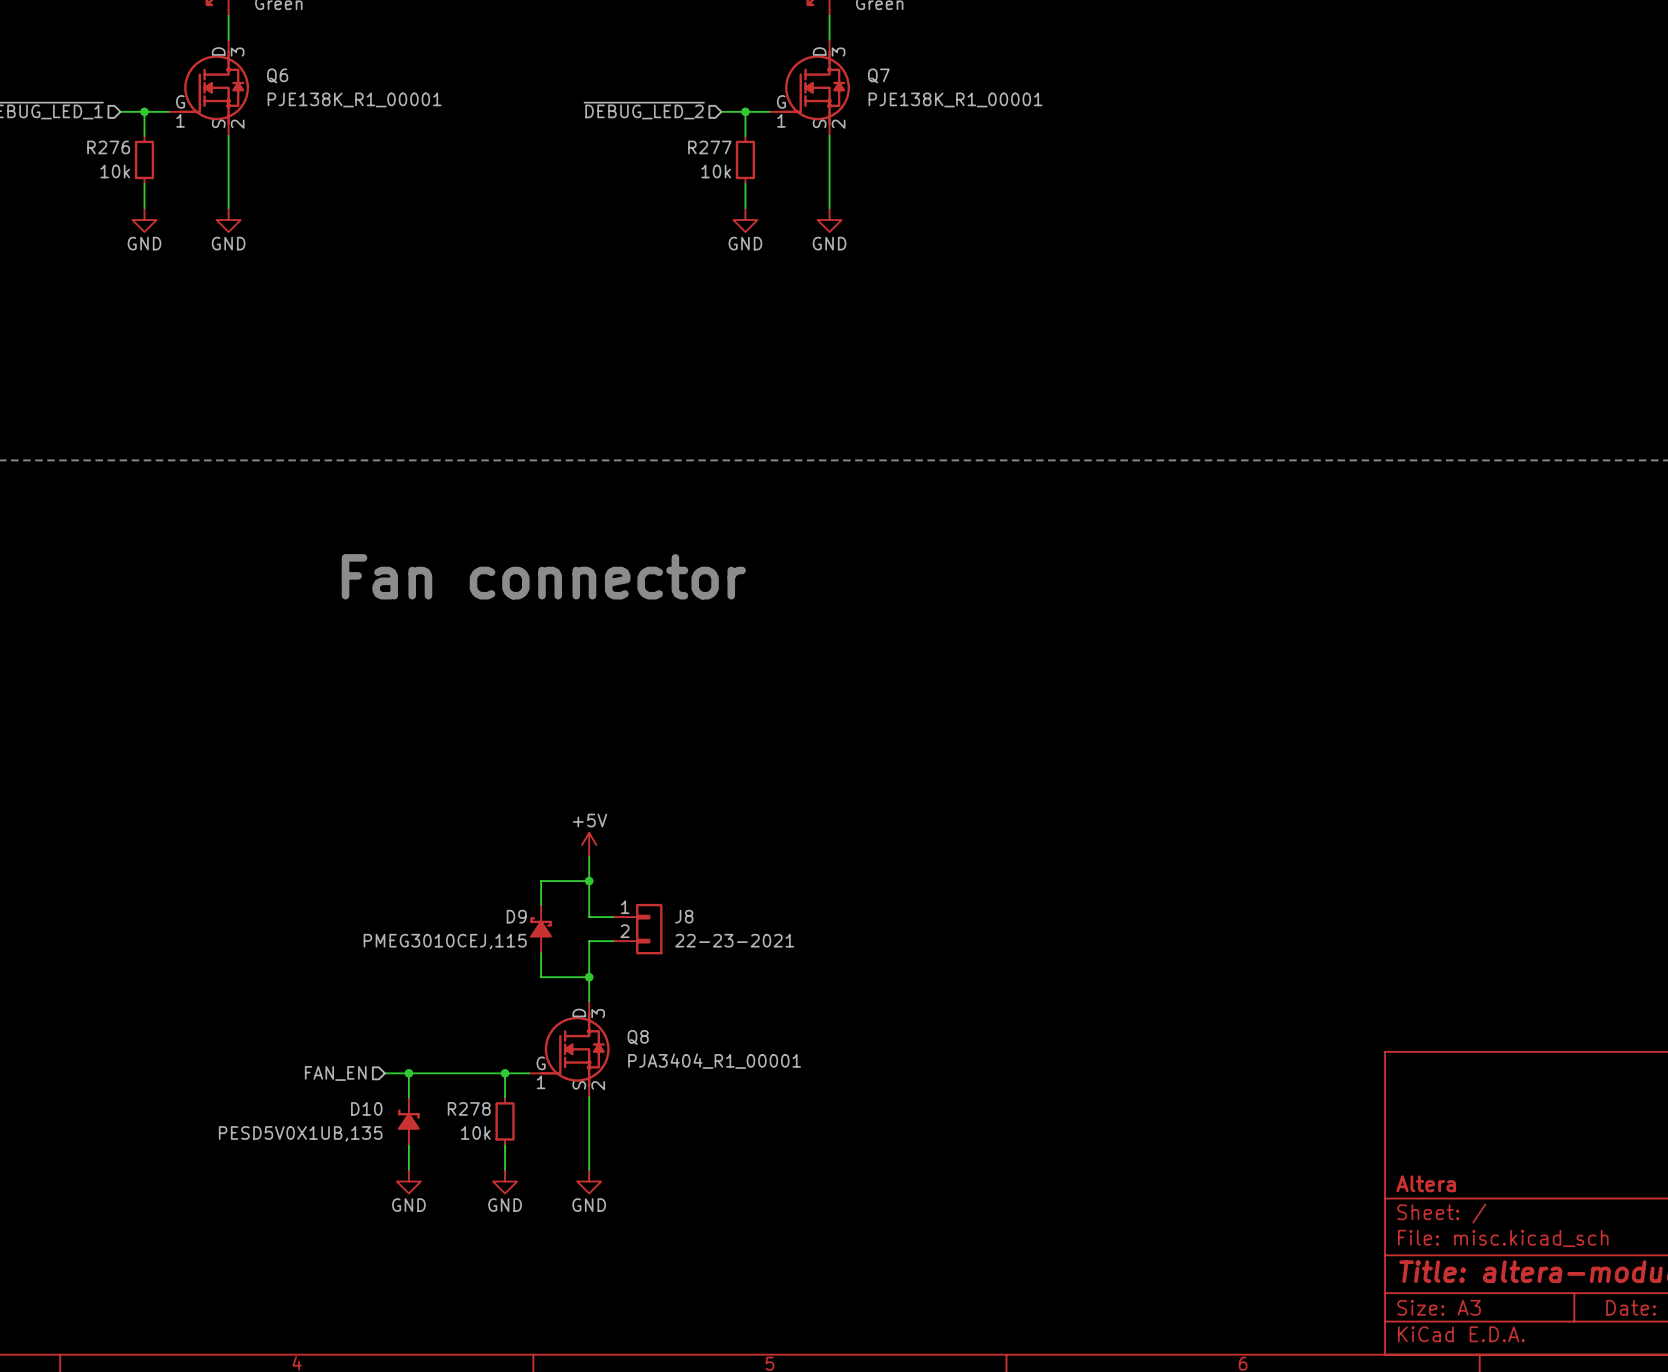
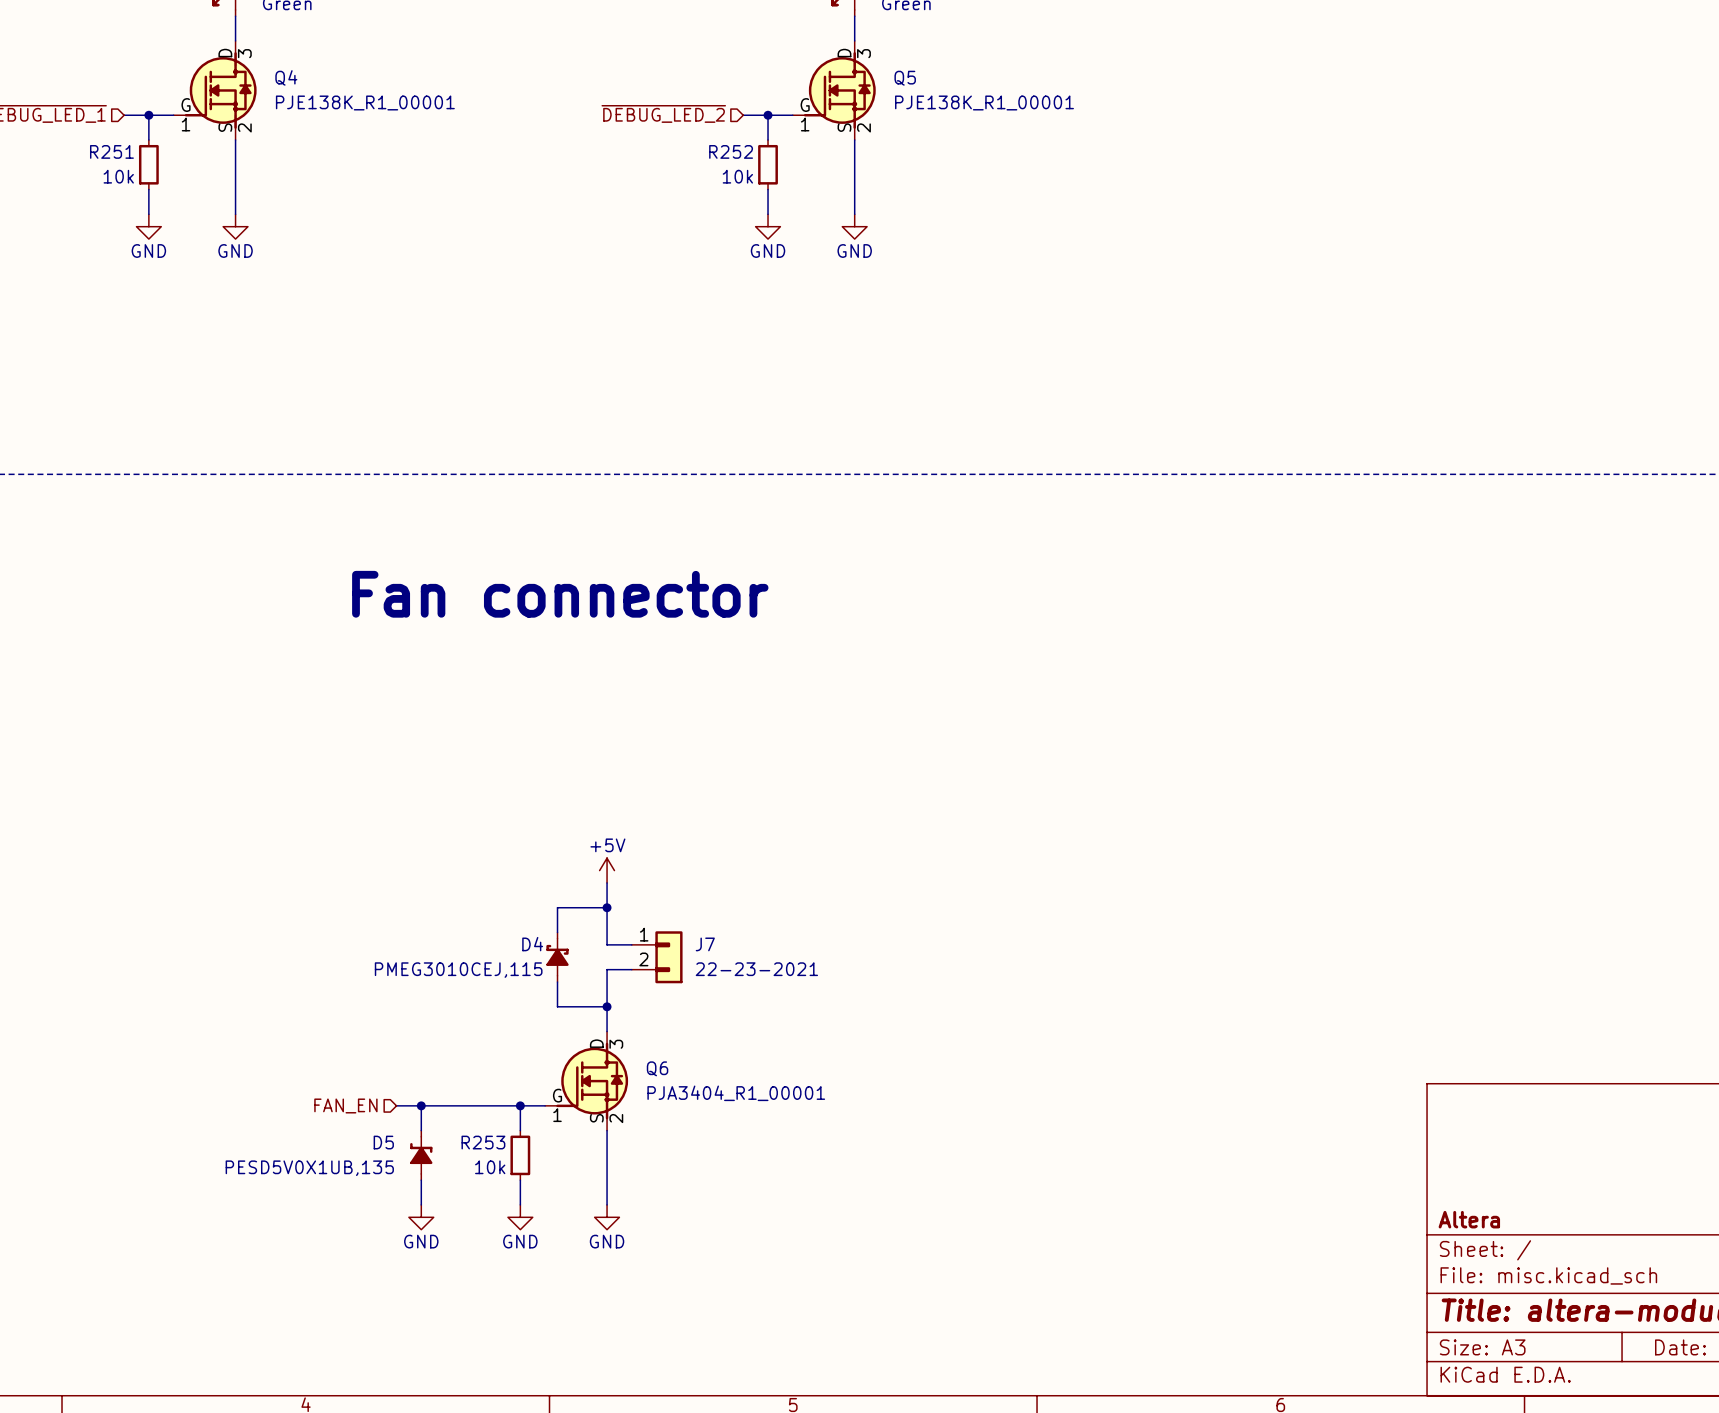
Q6 name: Q6 (277, 75) -> Q4 (286, 77)
Q7 name: Q7 (878, 75) -> Q5 (905, 78)
R276 name: R276 (108, 147) -> R251 (111, 151)
R277 name: R277 (709, 147) -> R252 (731, 151)
D9 name: D9 (516, 916) -> D4 (532, 944)
J8 name: J8 (684, 916) -> J7 (705, 944)
Q8 name: Q8 (638, 1037) -> Q6 (657, 1068)
D10 name: D10 (366, 1108) -> D5 (383, 1142)
R278 name: R278 (469, 1108) -> R253 (483, 1142)

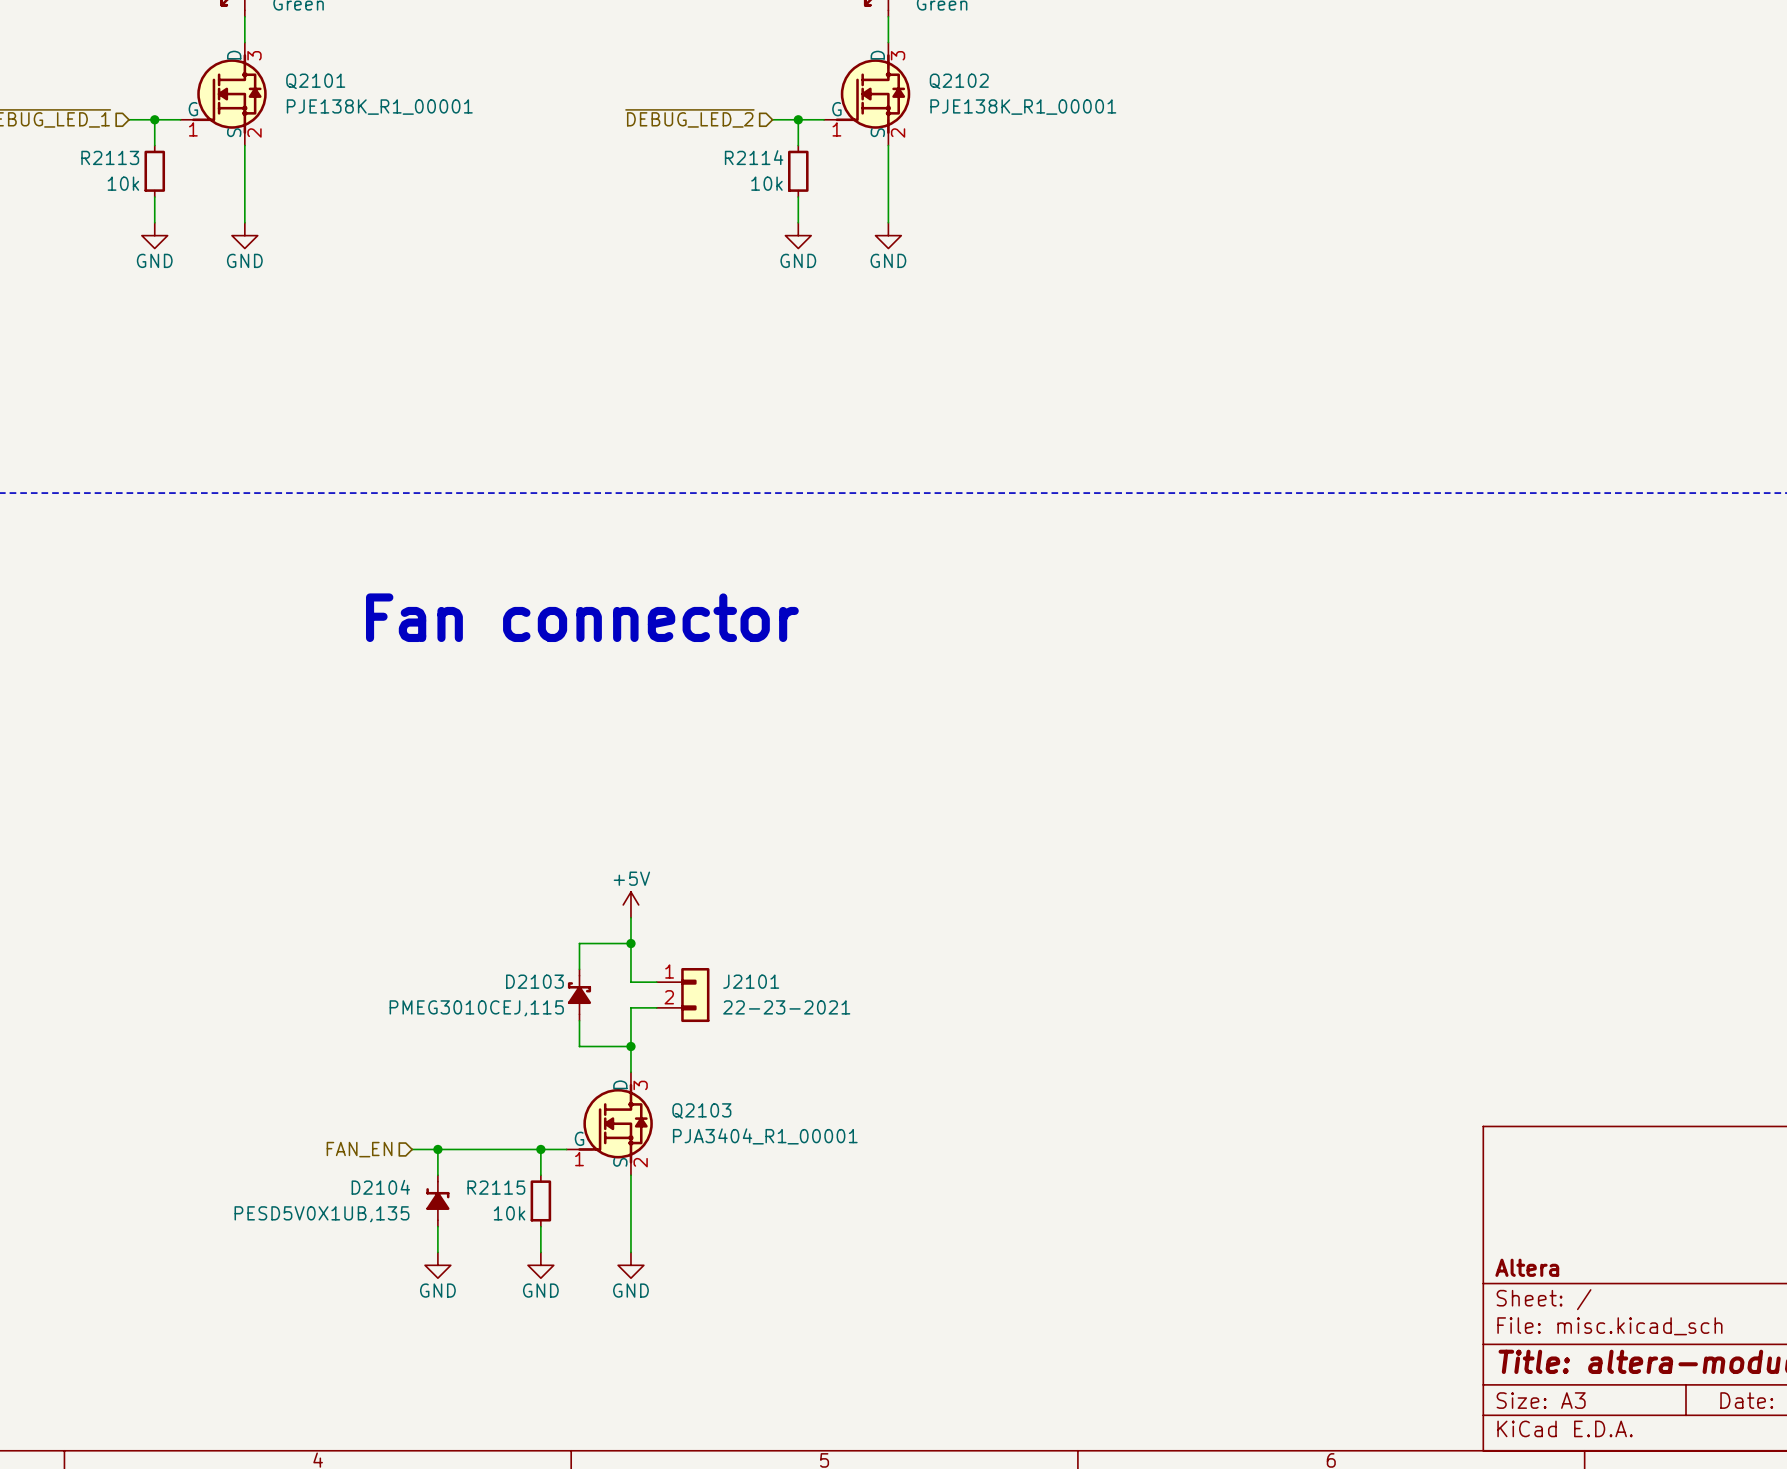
Q4 name: Q4 (286, 77) -> Q2101 (315, 81)
Q5 name: Q5 (905, 78) -> Q2102 (959, 81)
R251 name: R251 (111, 151) -> R2113 (110, 157)
R252 name: R252 (731, 151) -> R2114 (754, 157)
D4 name: D4 (532, 944) -> D2103 (534, 981)
J7 name: J7 (705, 944) -> J2101 (751, 981)
Q6 name: Q6 (657, 1068) -> Q2103 (701, 1110)
D5 name: D5 (383, 1142) -> D2104 (380, 1187)
R253 name: R253 (483, 1142) -> R2115 (496, 1187)

